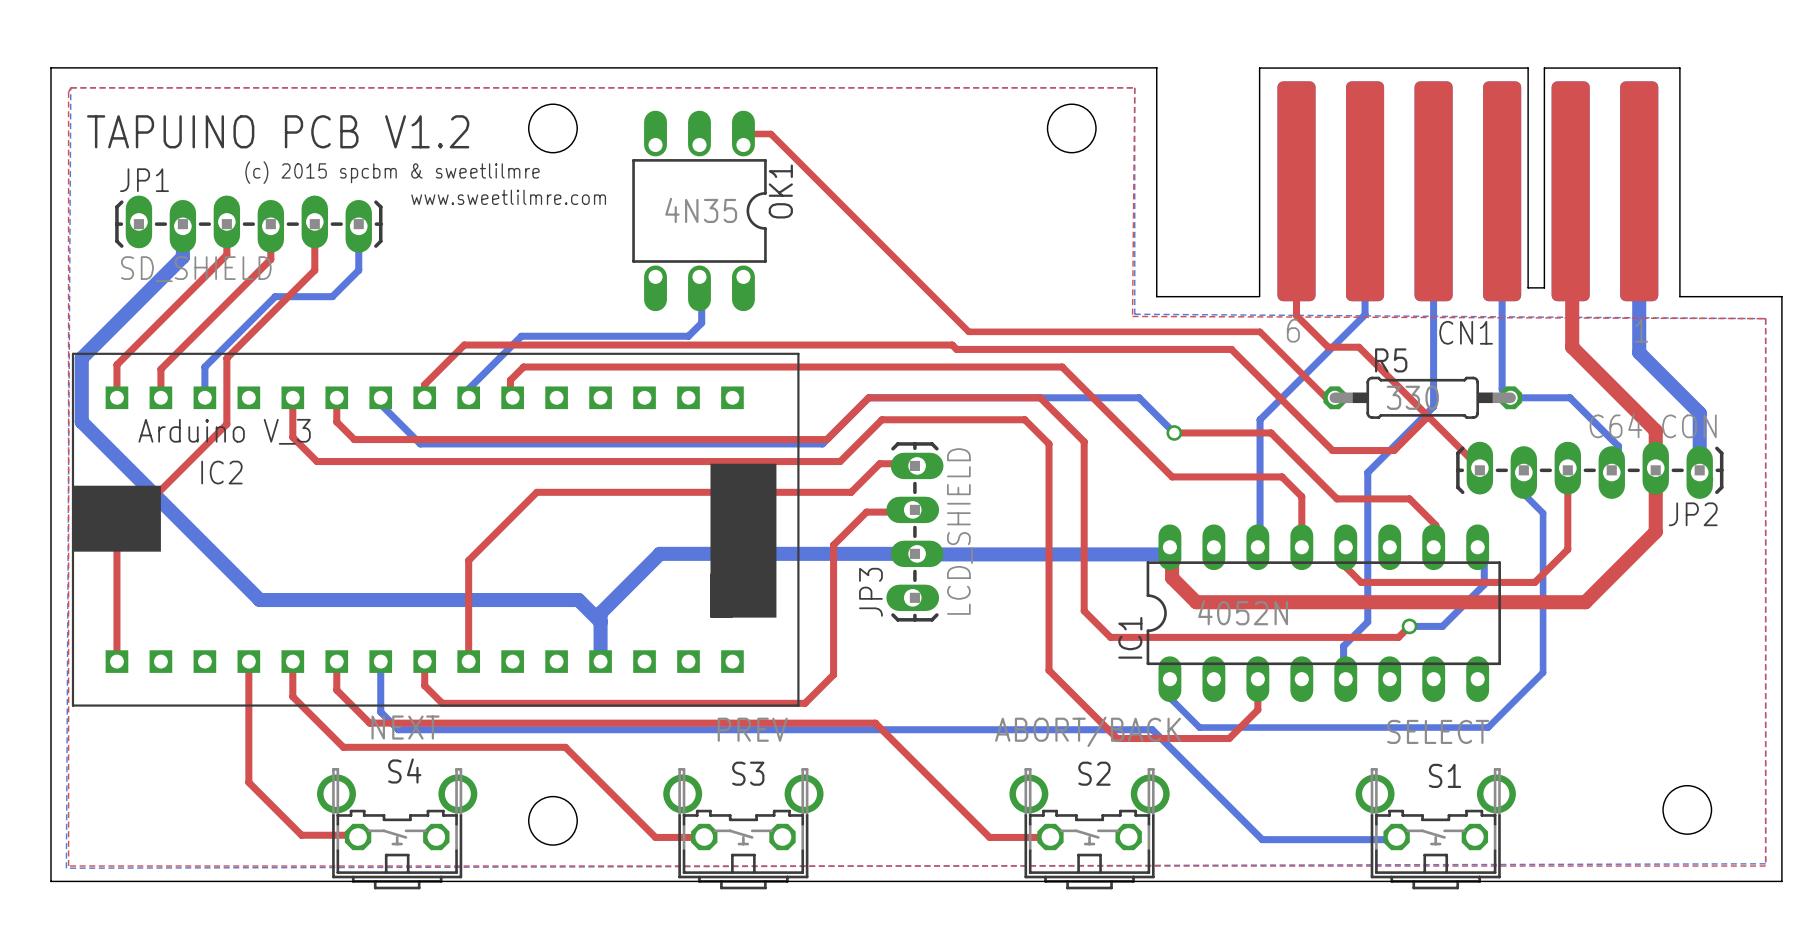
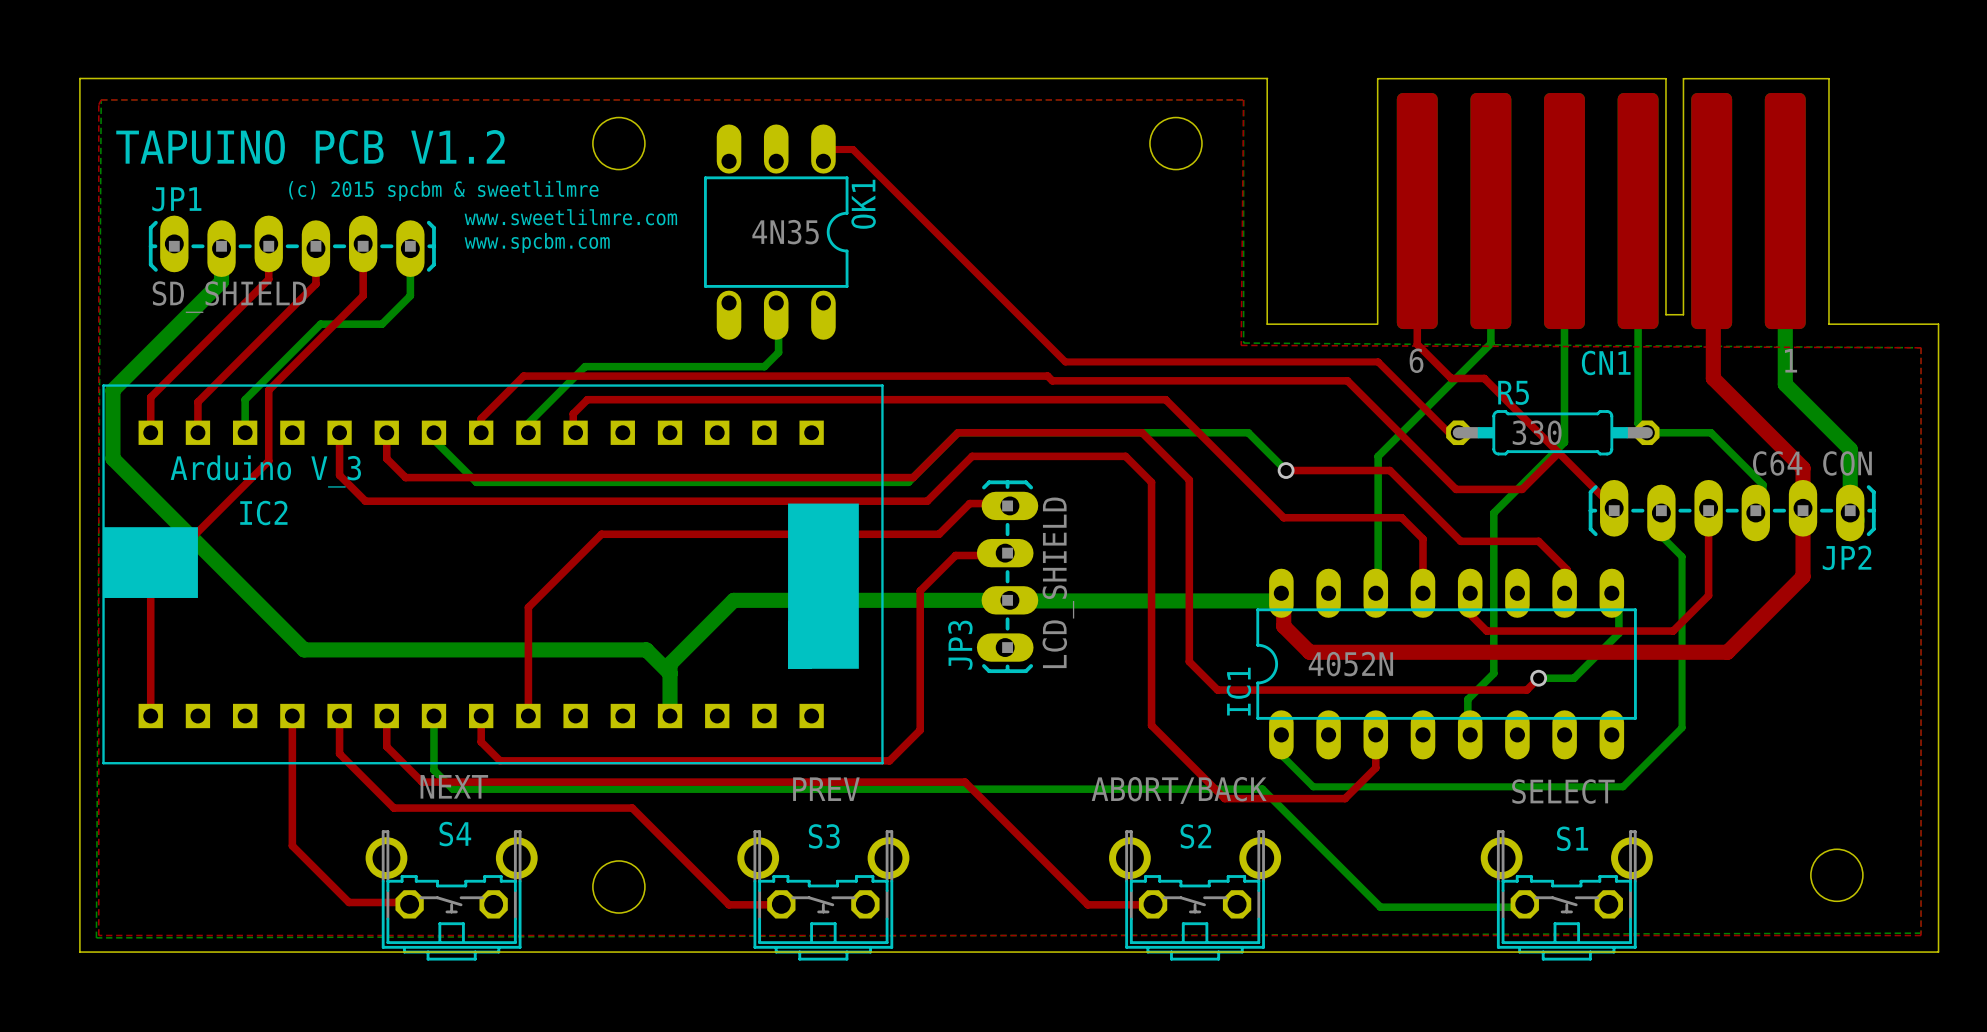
text: none -> www.spcbm.com (537, 242)

